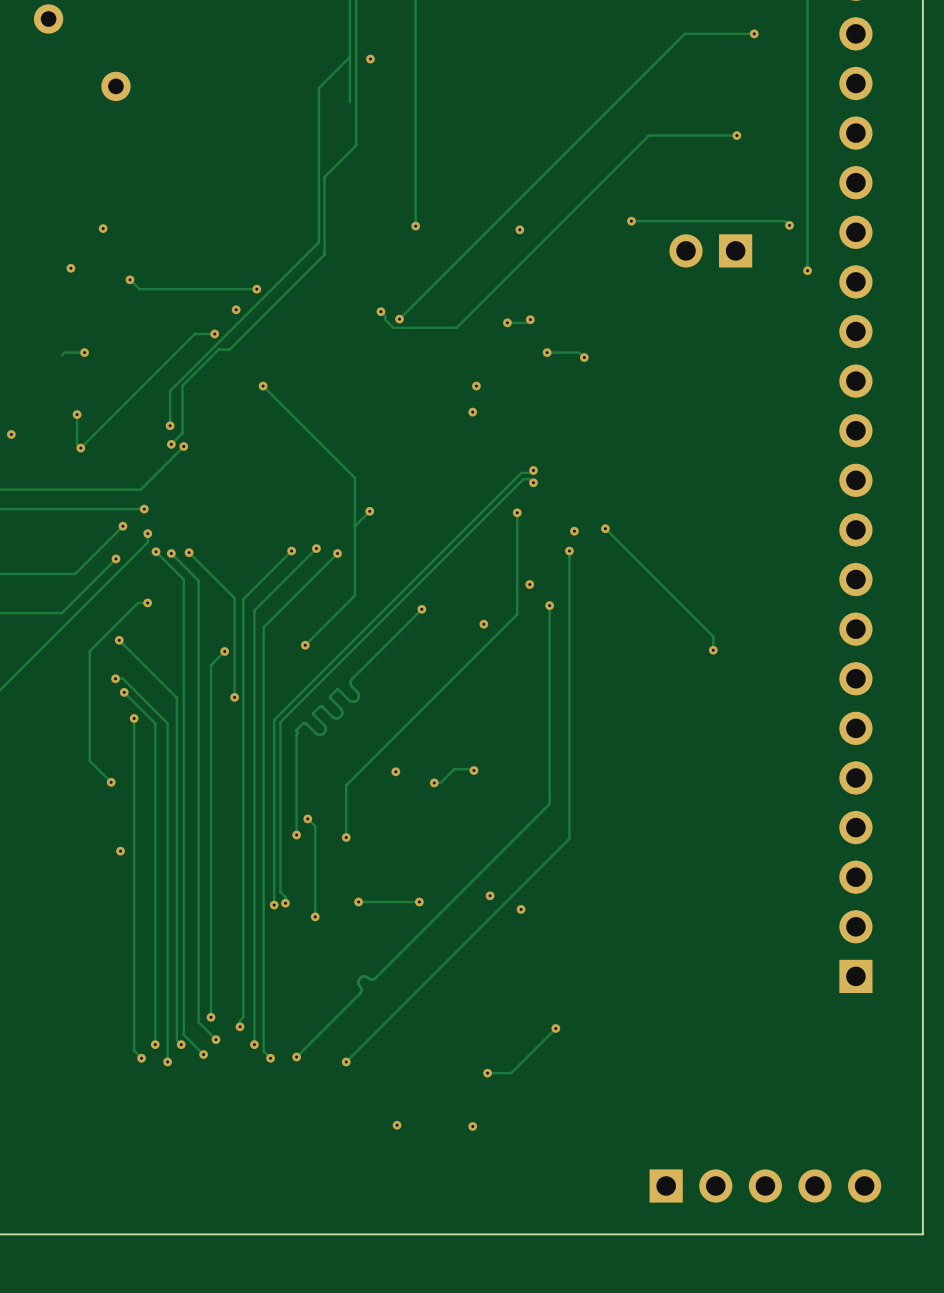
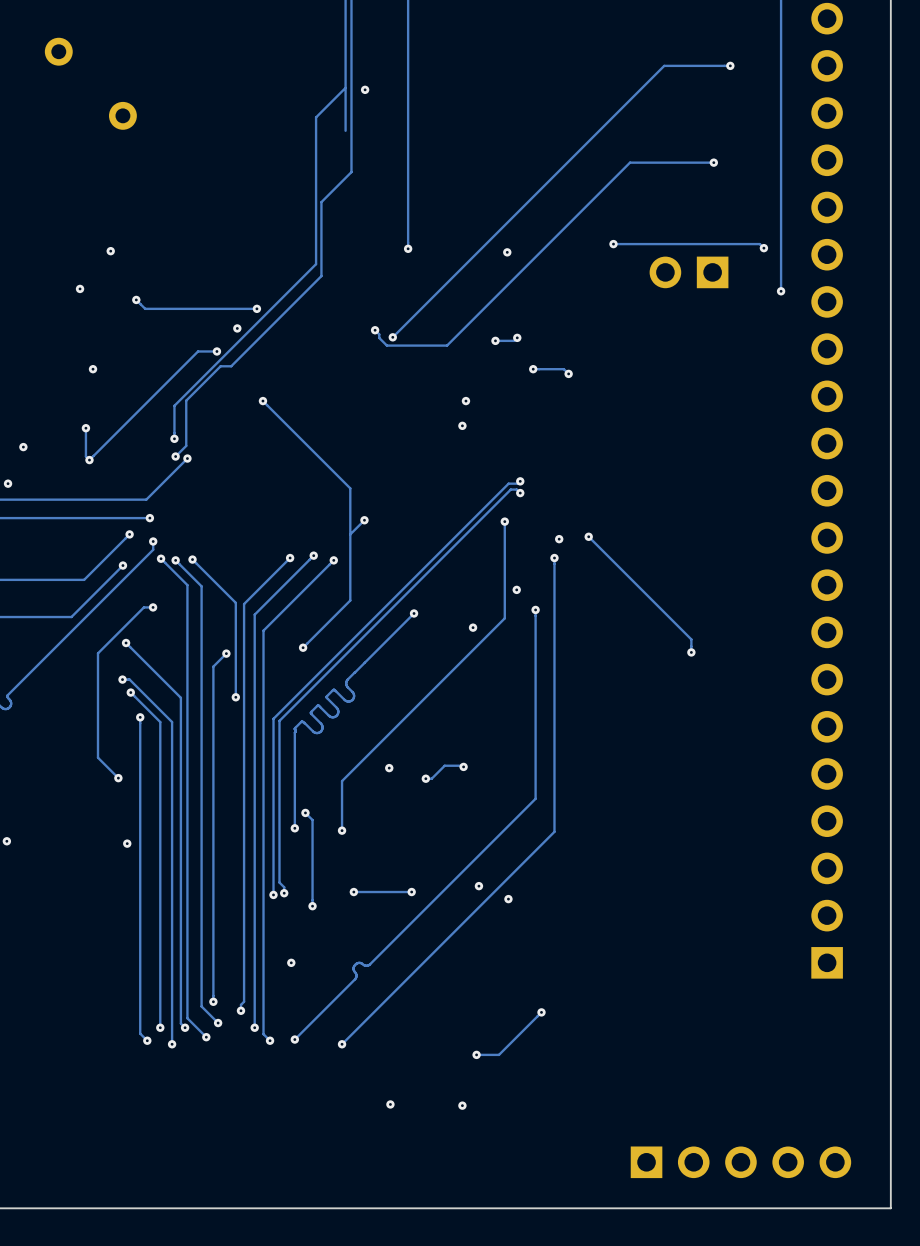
track: (84, 352) (64, 352) (62, 355) -> none
via: none -> (291, 962)

